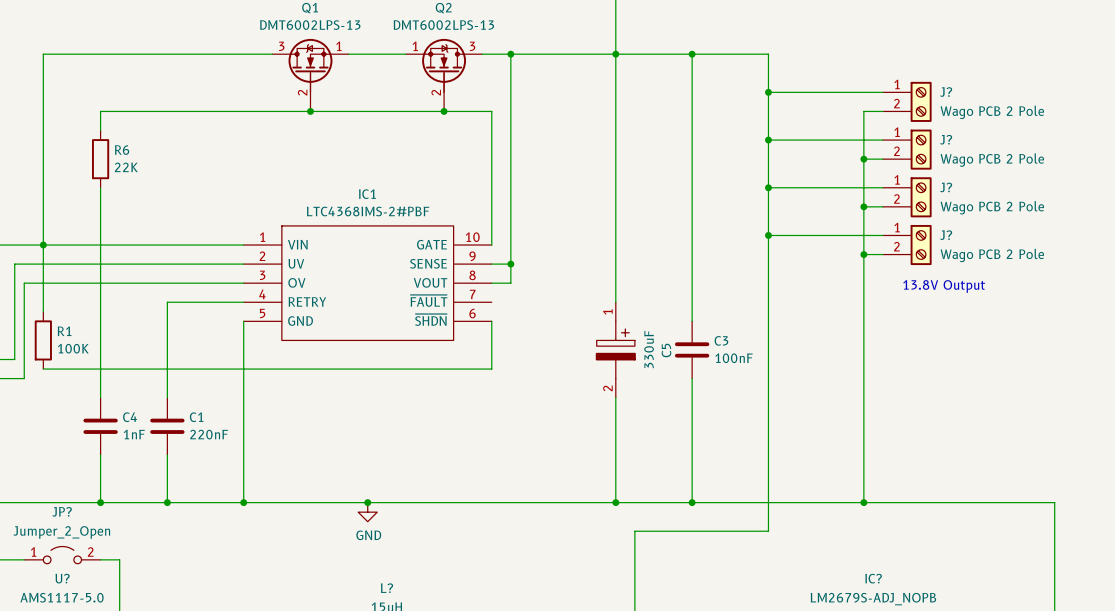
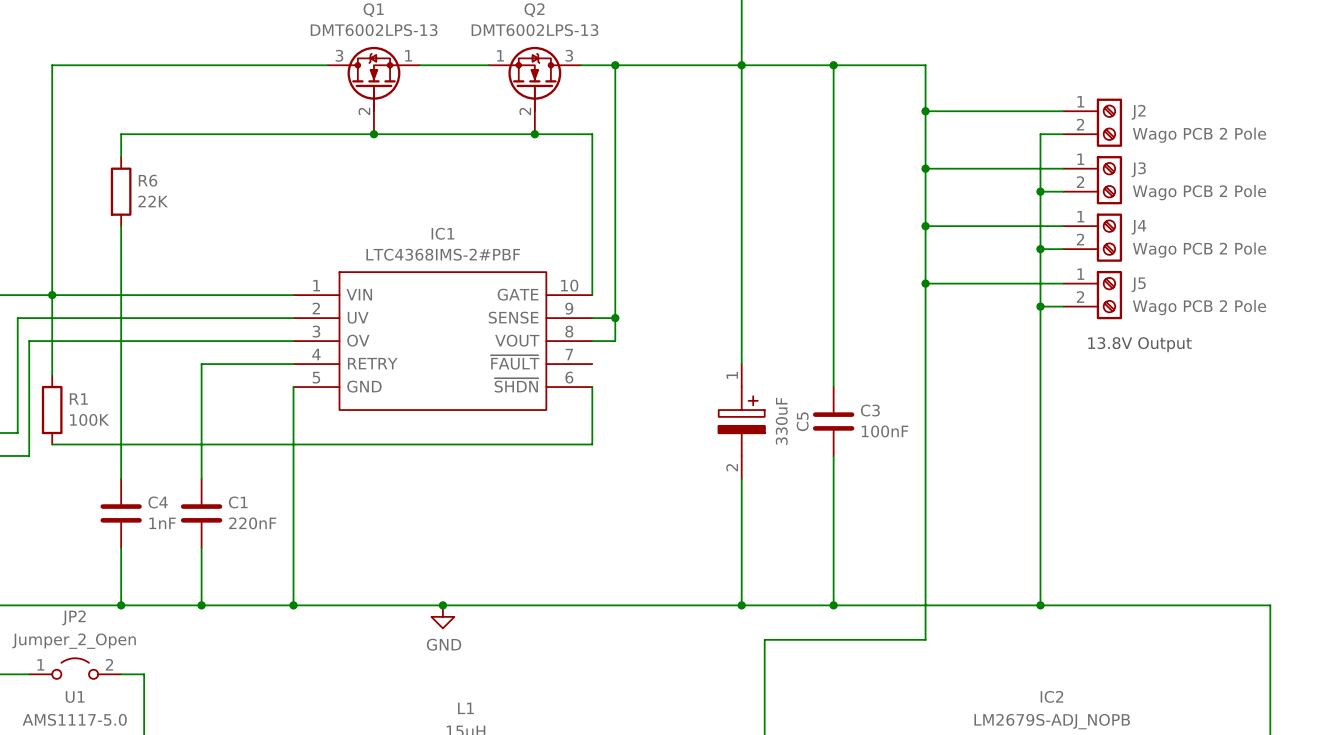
J? name: J? (946, 92) -> J2 (1138, 112)
J? name: J? (946, 139) -> J3 (1138, 169)
J? name: J? (946, 187) -> J4 (1138, 227)
J? name: J? (946, 235) -> J5 (1138, 284)
JP? name: JP? (62, 511) -> JP2 (73, 617)
U? name: U? (62, 578) -> U1 (75, 696)
IC? name: IC? (873, 578) -> IC2 (1051, 696)
L? name: L? (387, 588) -> L1 (465, 708)

